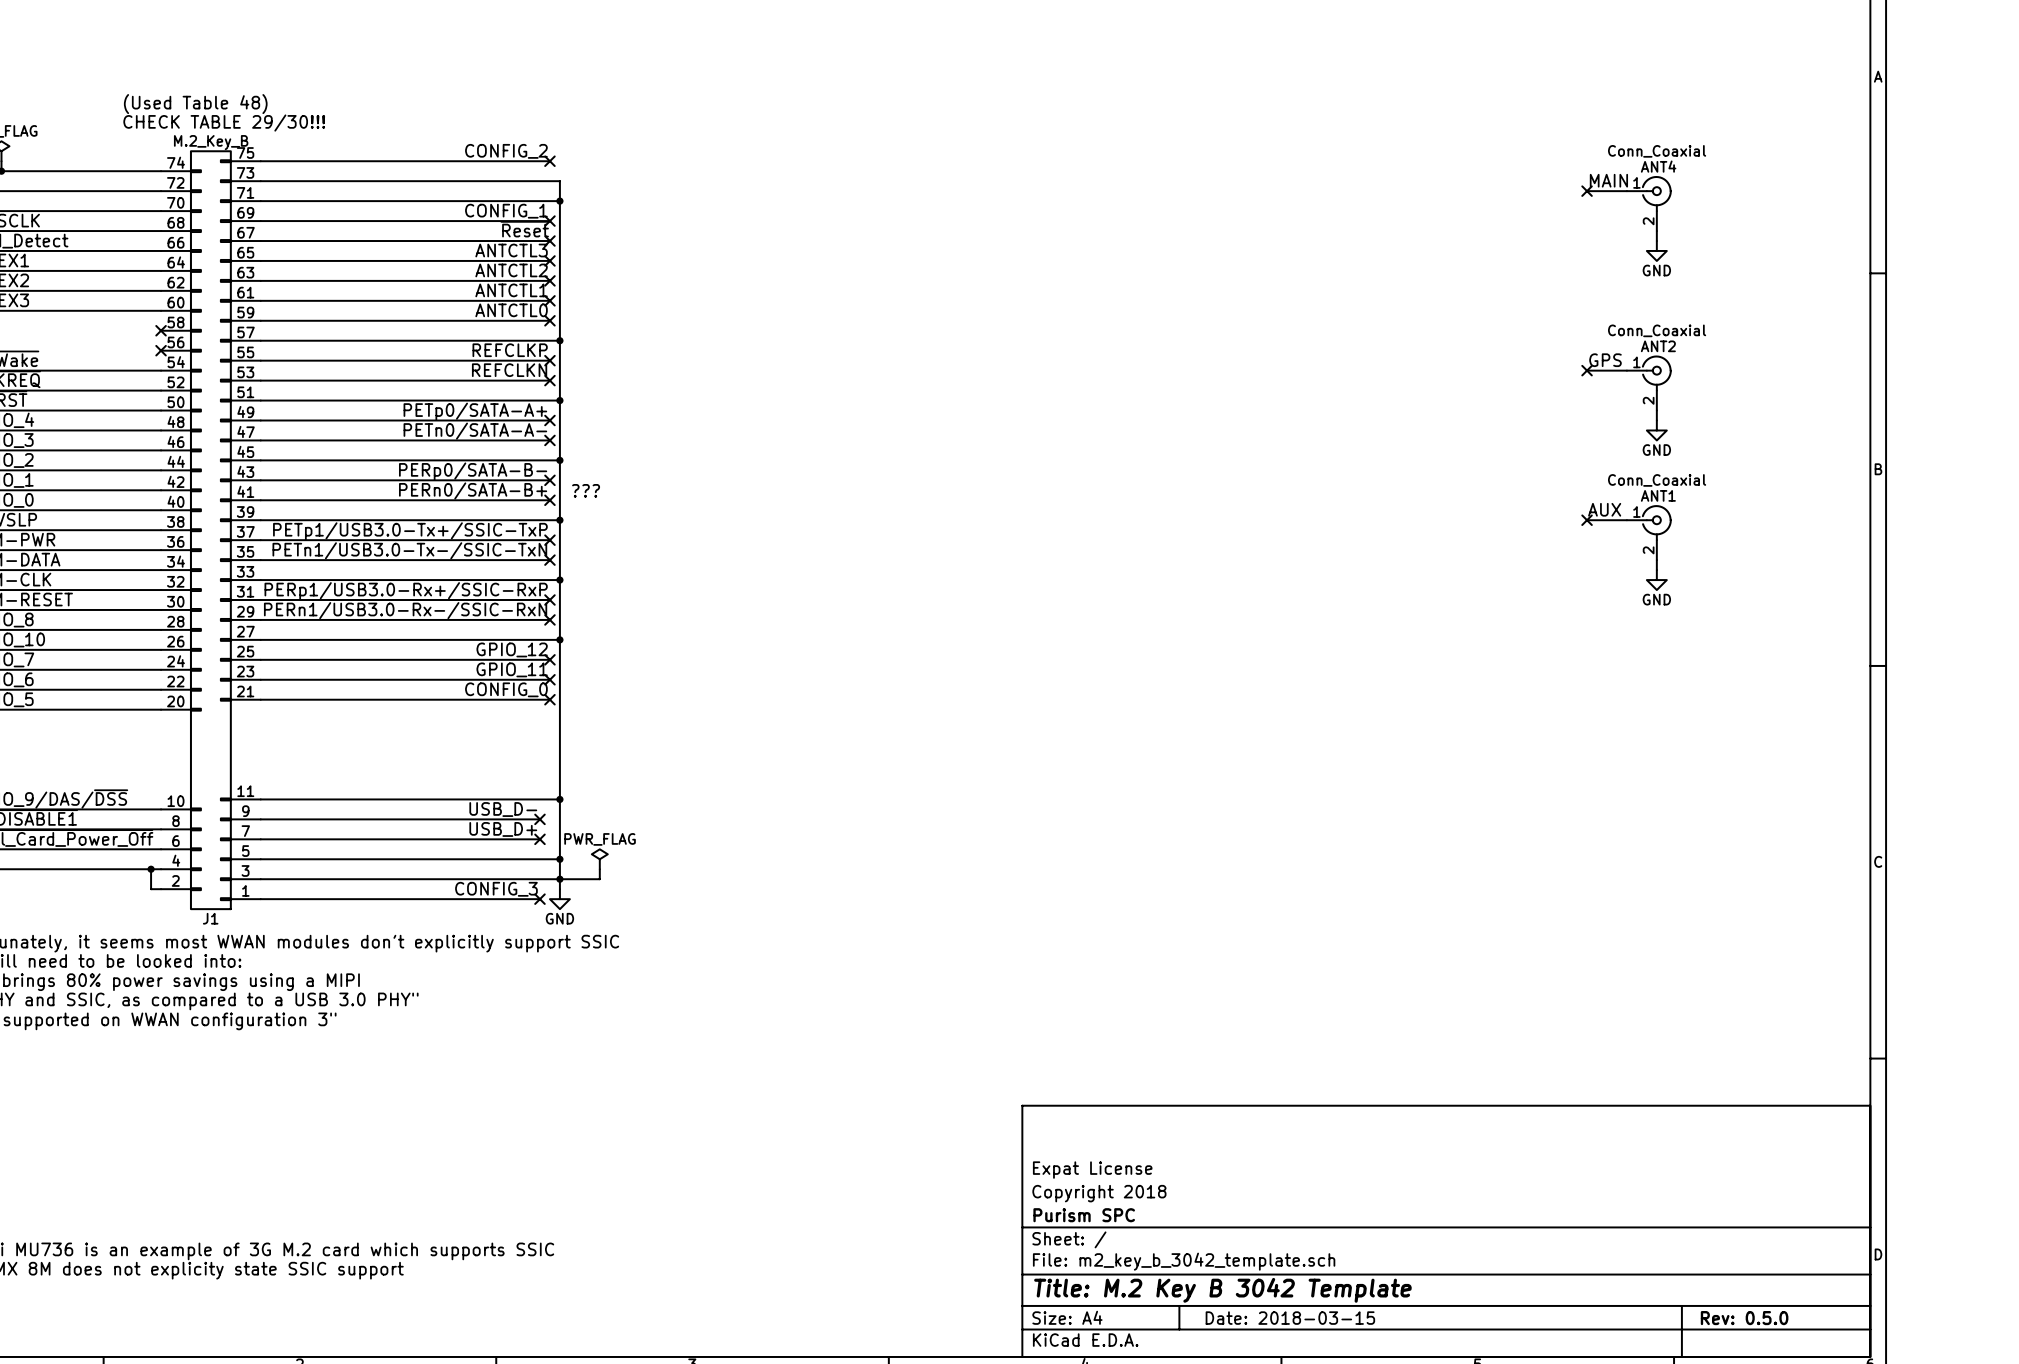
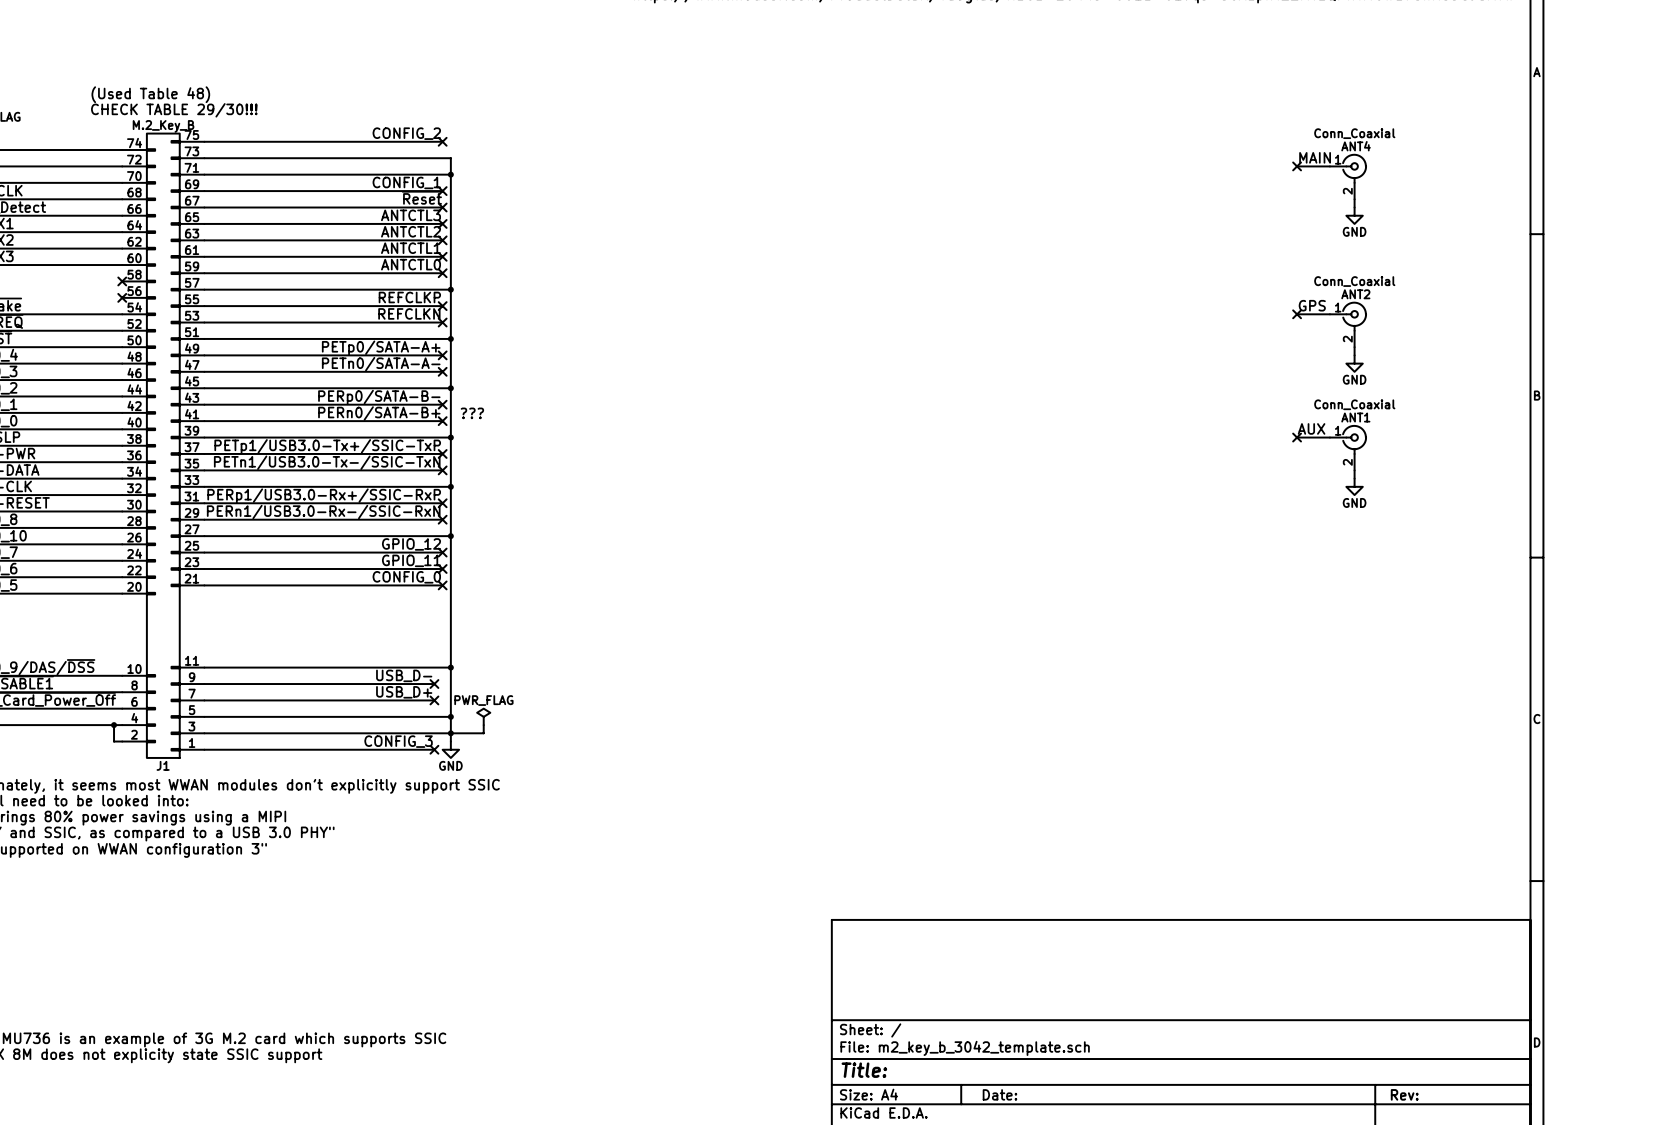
title block: Expat License (1092, 1170) -> none
title block: Copyright 2018 (1099, 1193) -> none
title block: Purism SPC (1084, 1215) -> none
title block: Title: M.2 Key B 3042 Template (1222, 1290) -> Title: (864, 1070)
title block: Date: 2018-03-15 (1290, 1318) -> Date: (999, 1094)
title block: Rev: 0.5.0 (1744, 1318) -> Rev: (1404, 1094)

